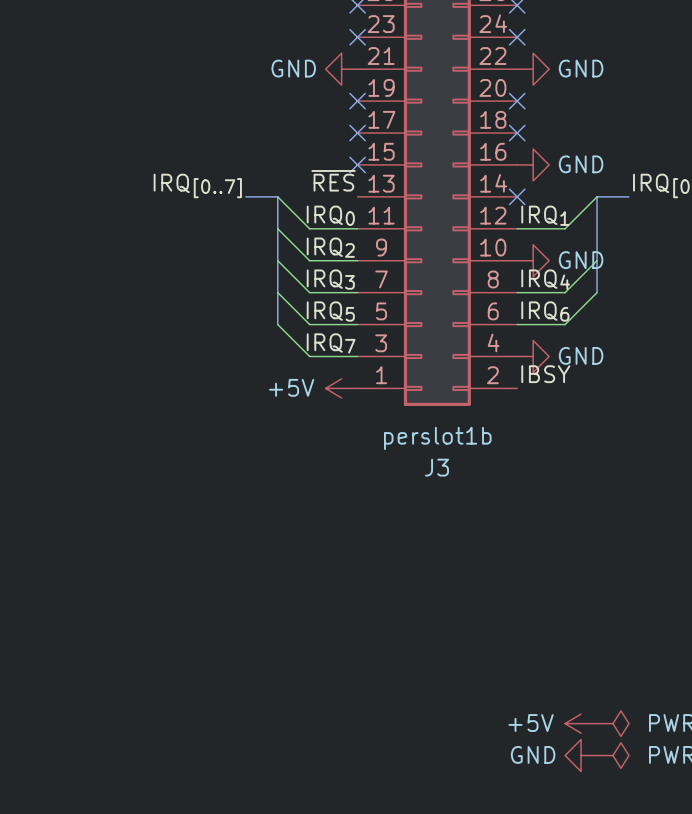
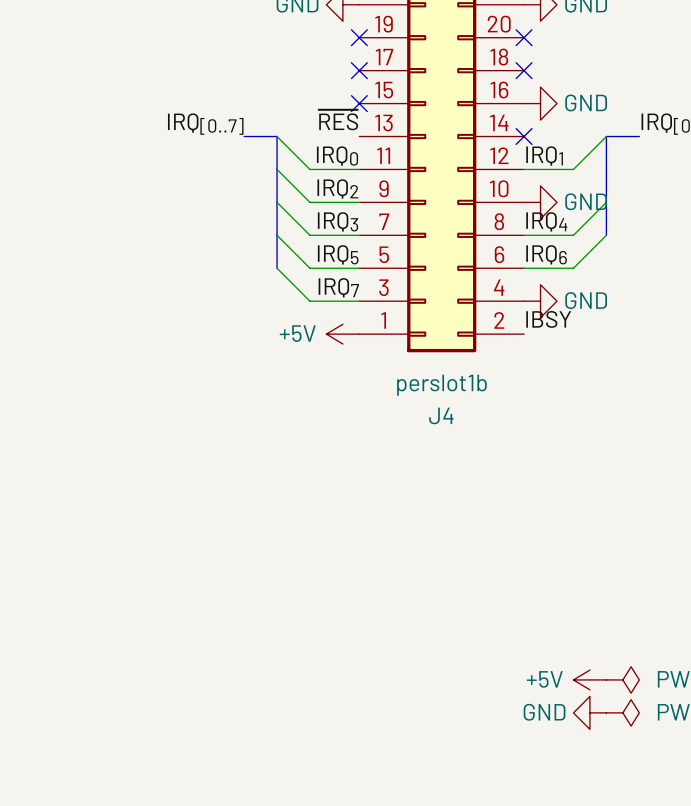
J3 name: J3 (437, 467) -> J4 (441, 415)

